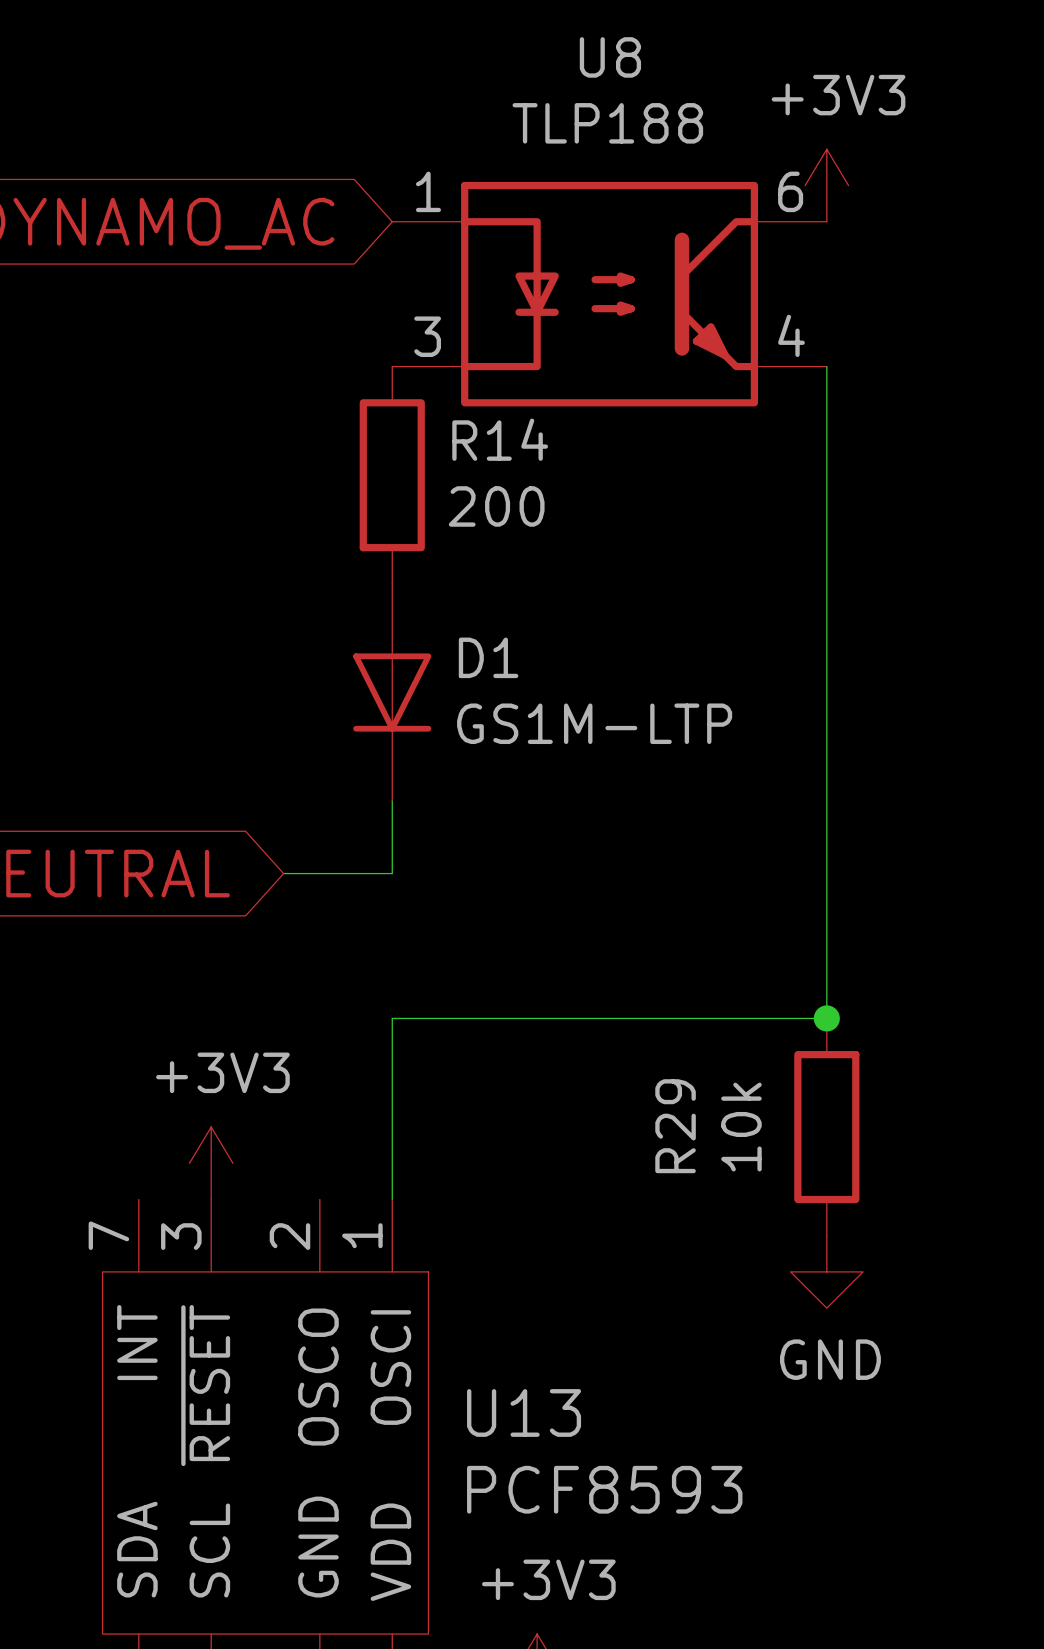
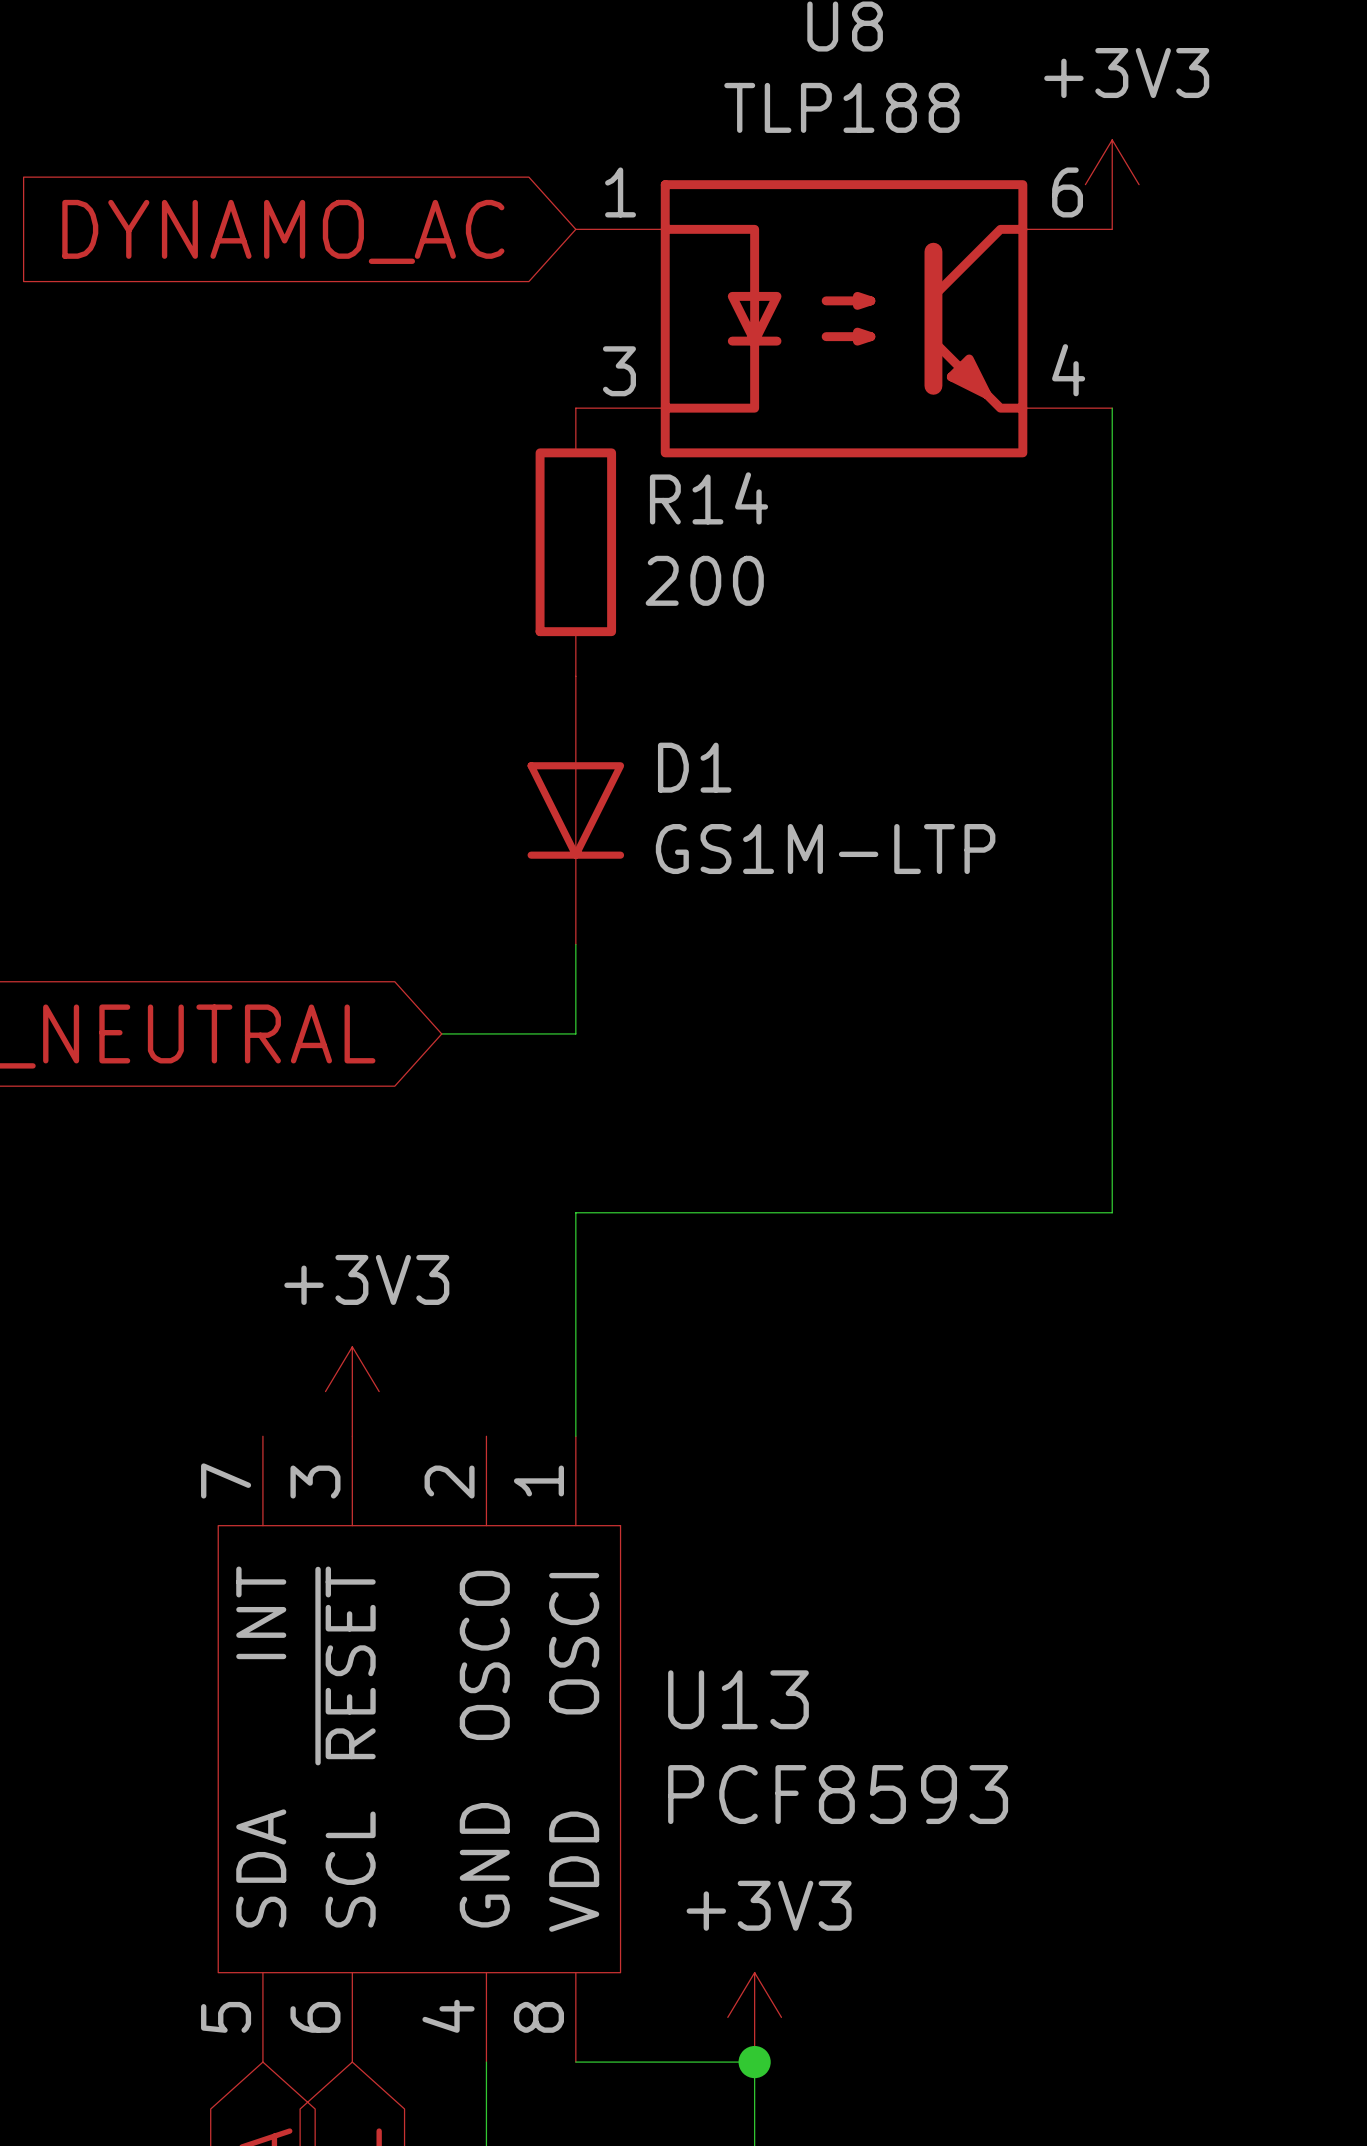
junction: (826, 1018) -> none
R29: 10k (826, 1127) -> none
power symbol: GND (826, 1271) -> none

